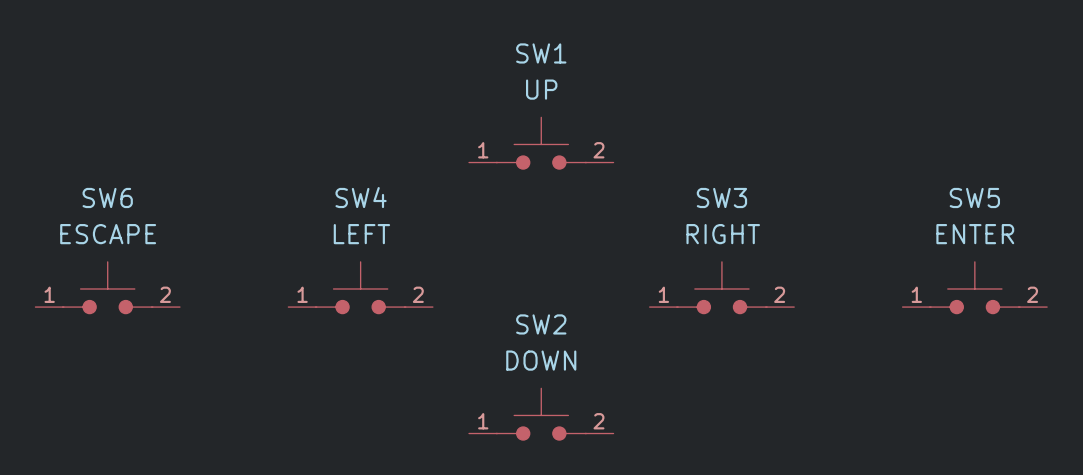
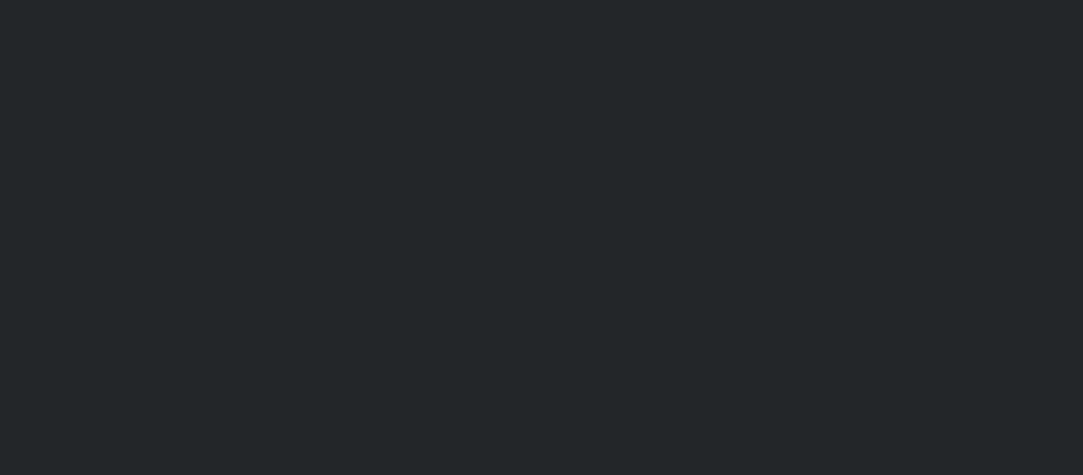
SW1: UP (541, 143) -> none
SW6: ESCAPE (107, 287) -> none
SW4: LEFT (360, 287) -> none
SW3: RIGHT (721, 287) -> none
SW5: ENTER (974, 287) -> none
SW2: DOWN (541, 414) -> none

